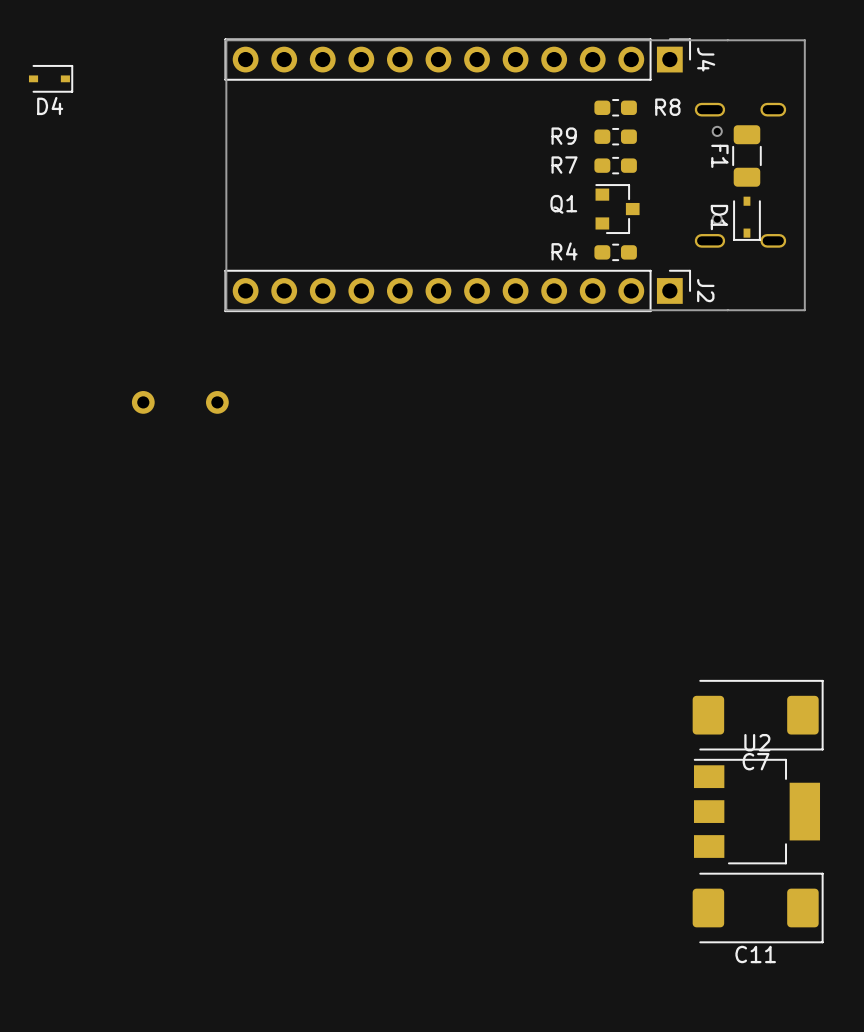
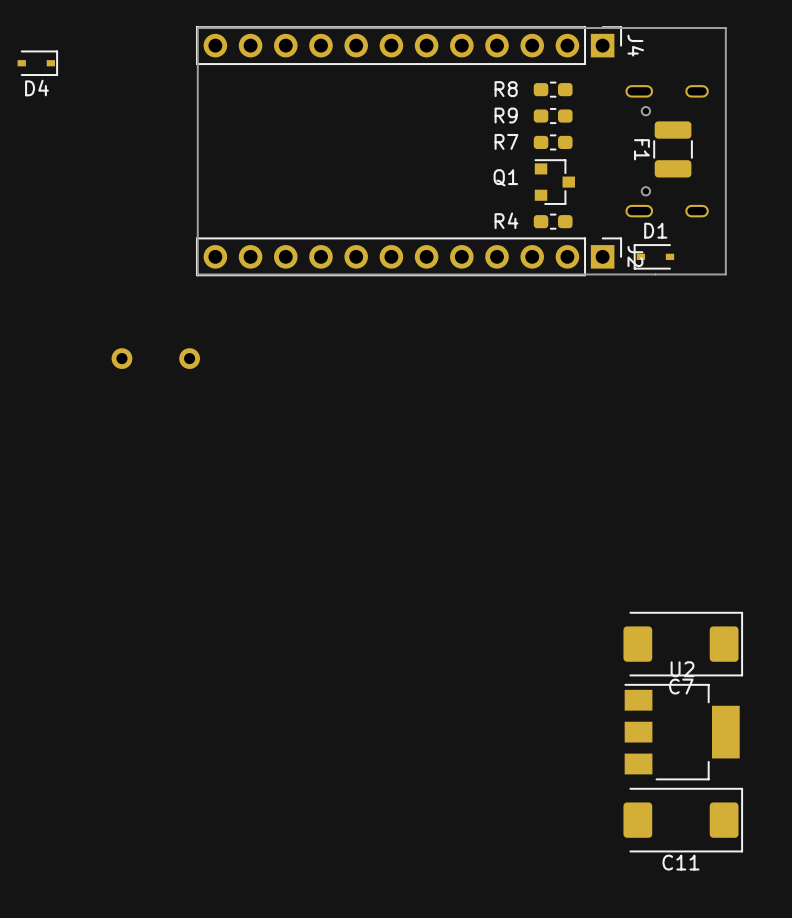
R8 name position: R8 (667, 107) -> R8 (506, 89)
F1 footprint: [732, 125, 762, 187] -> [653, 121, 693, 178]
D1 rotation: 0° (746, 218) -> 90° clockwise (653, 256)
D1 position: (746, 218) -> (653, 256)

